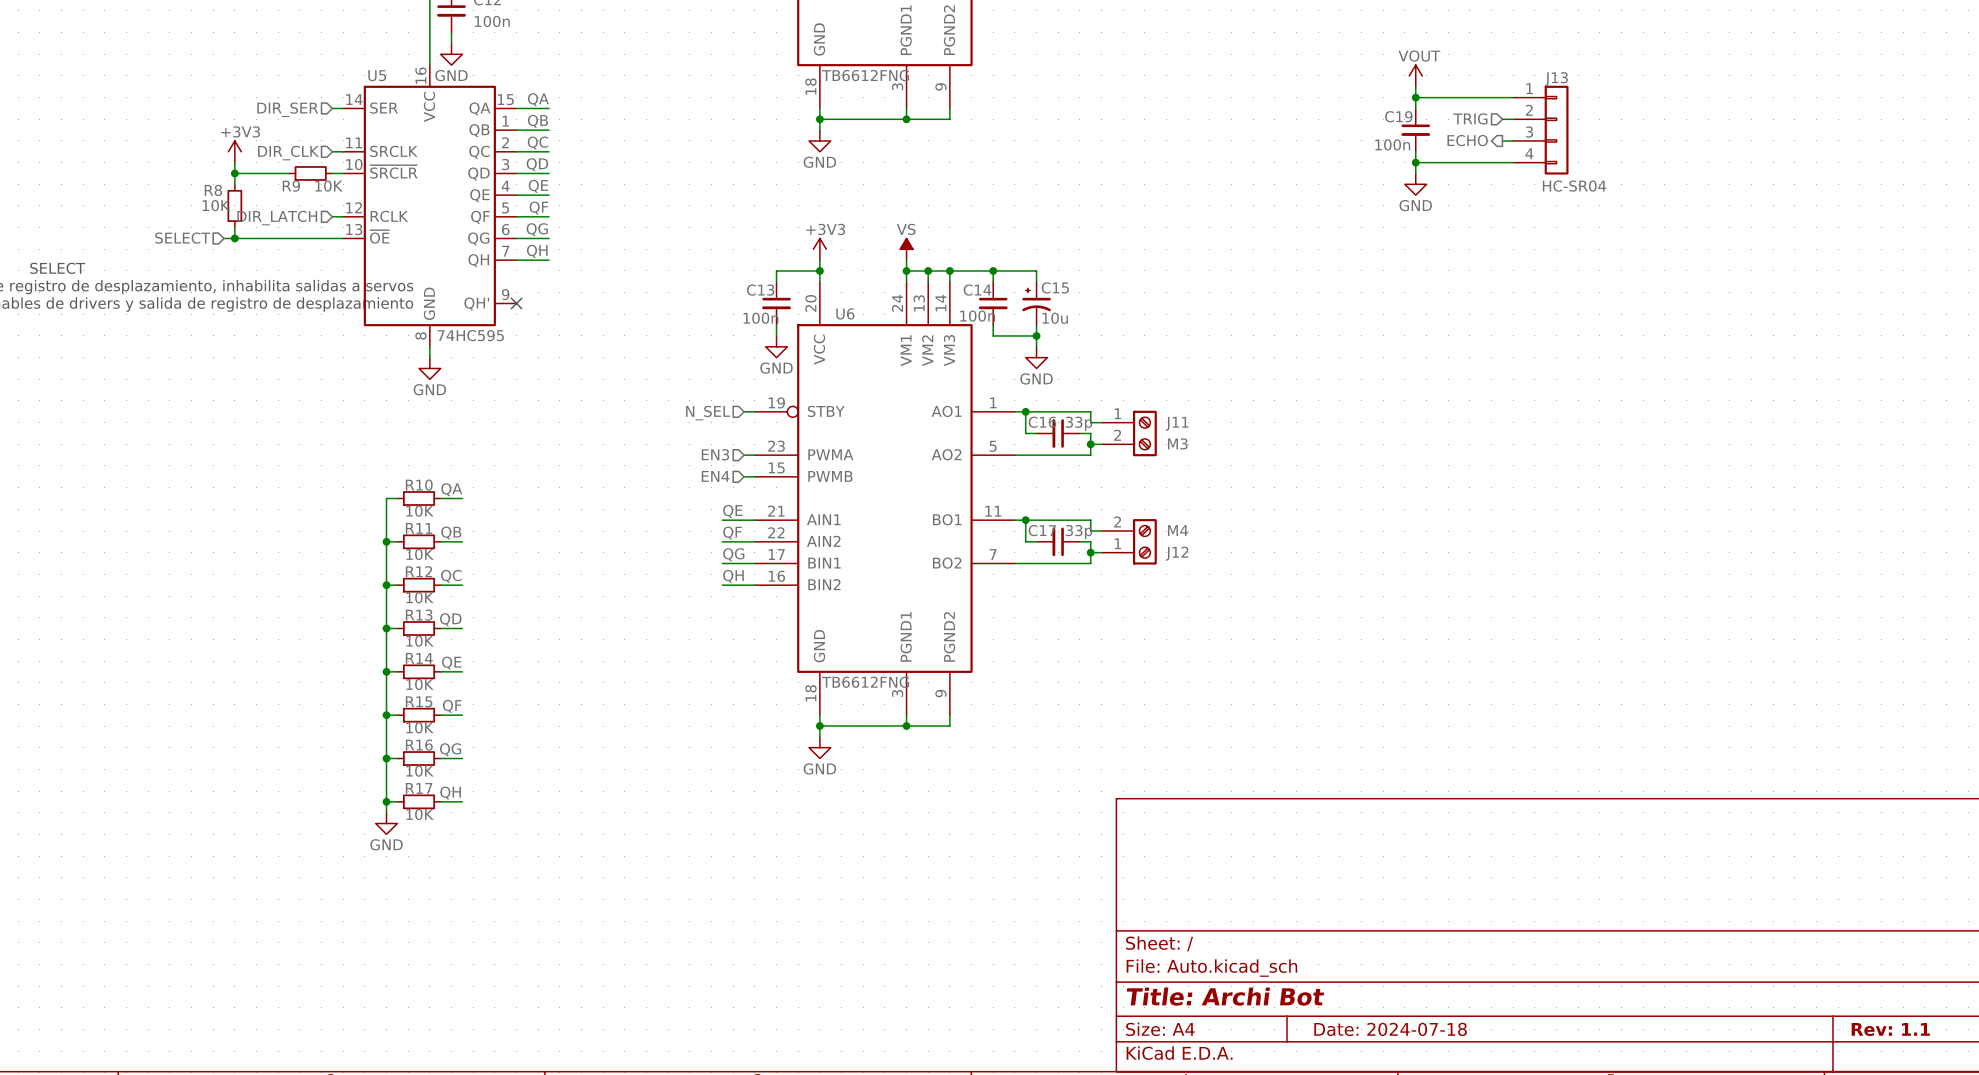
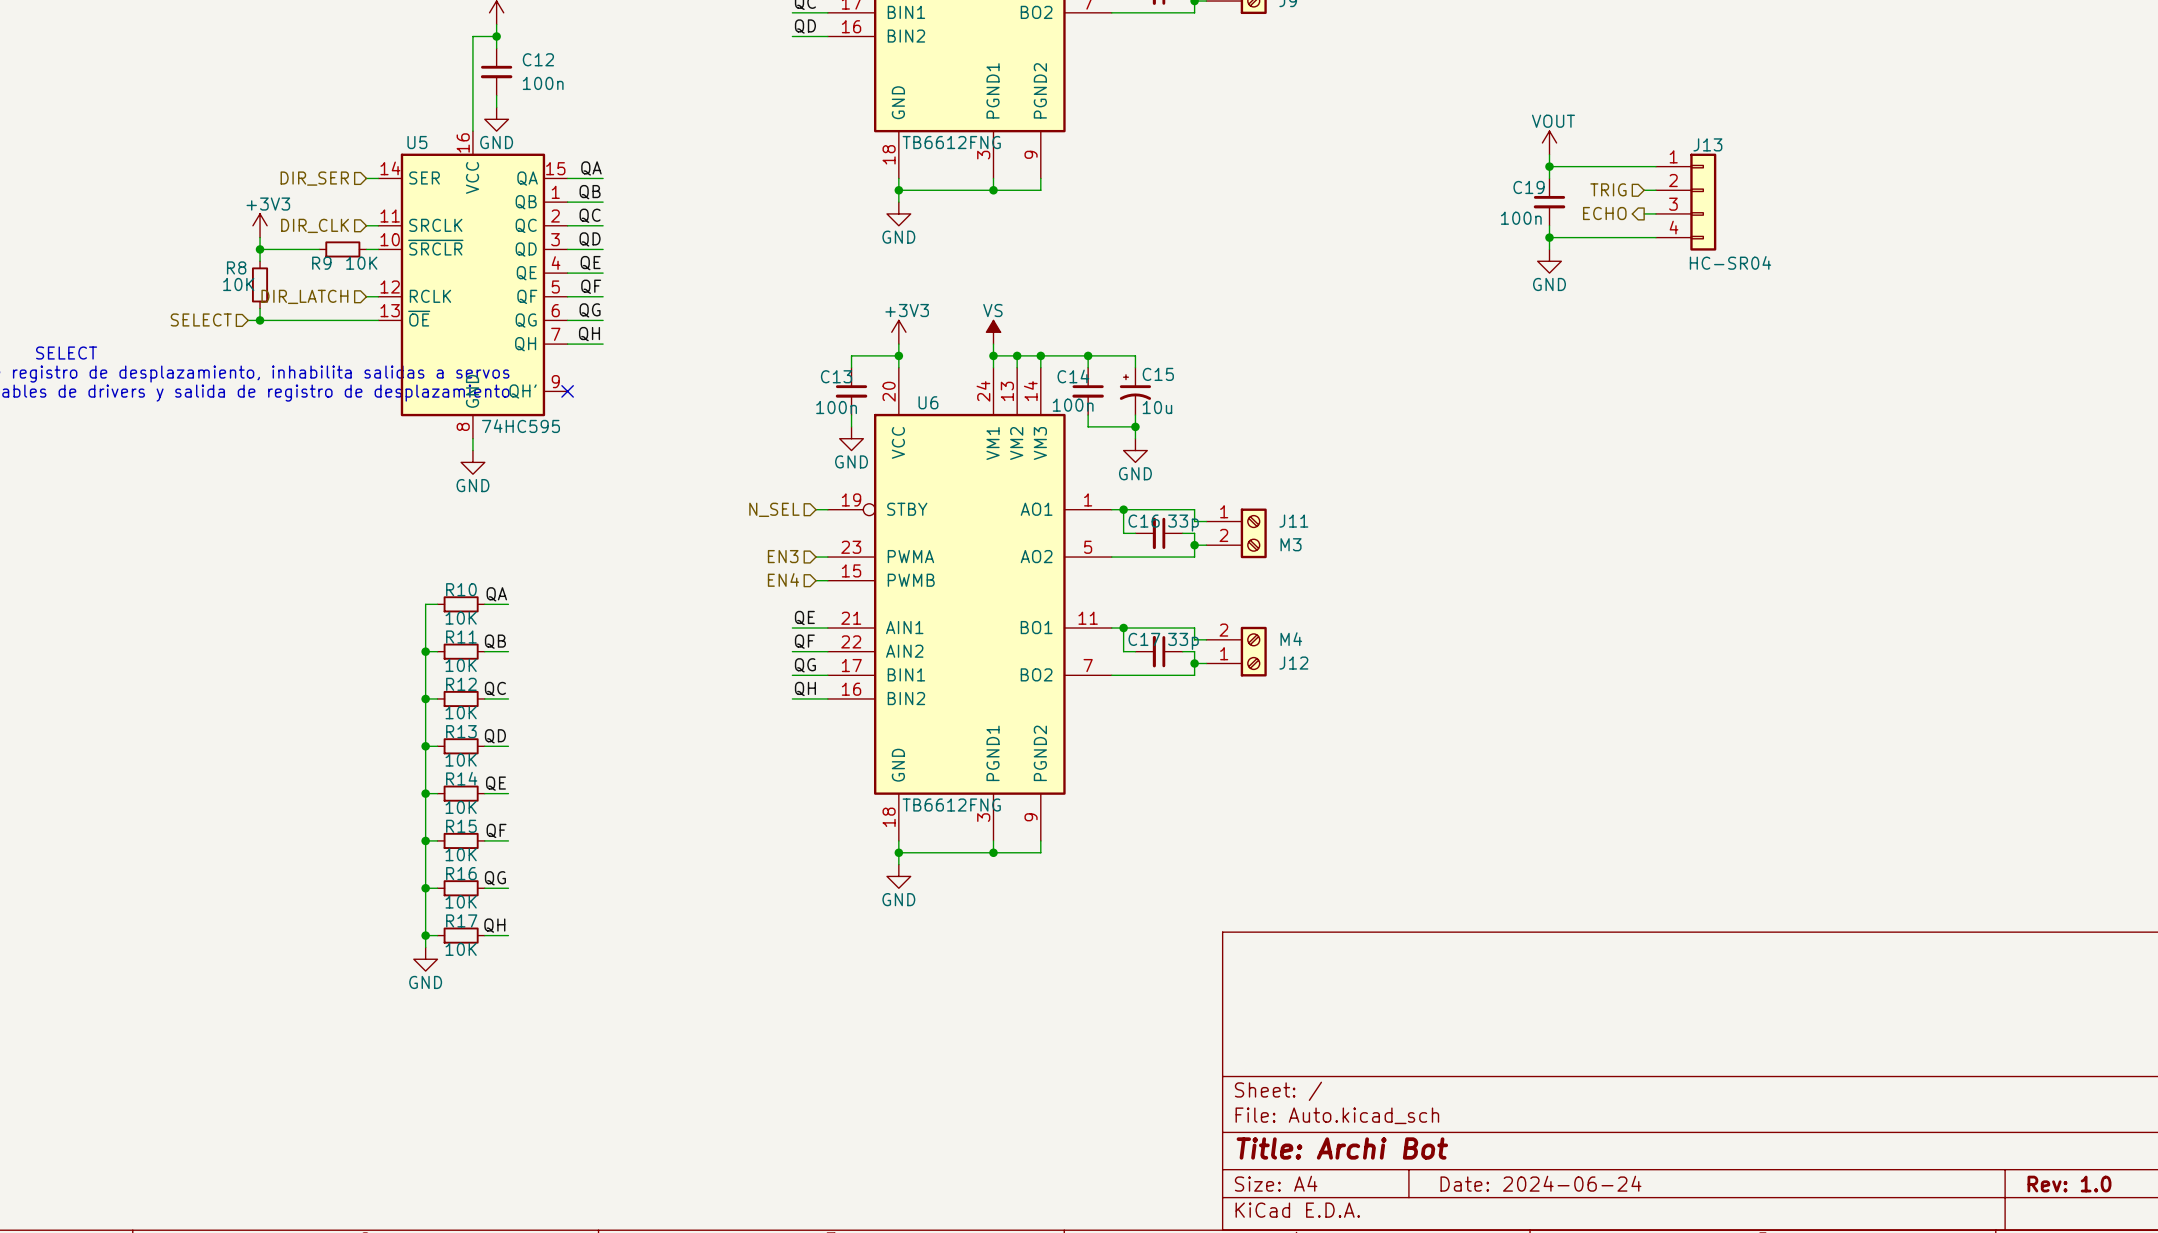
title block: Date: 2024-07-18 (1390, 1029) -> Date: 2024-06-24 (1540, 1183)
title block: Rev: 1.1 (1890, 1029) -> Rev: 1.0 (2069, 1184)

